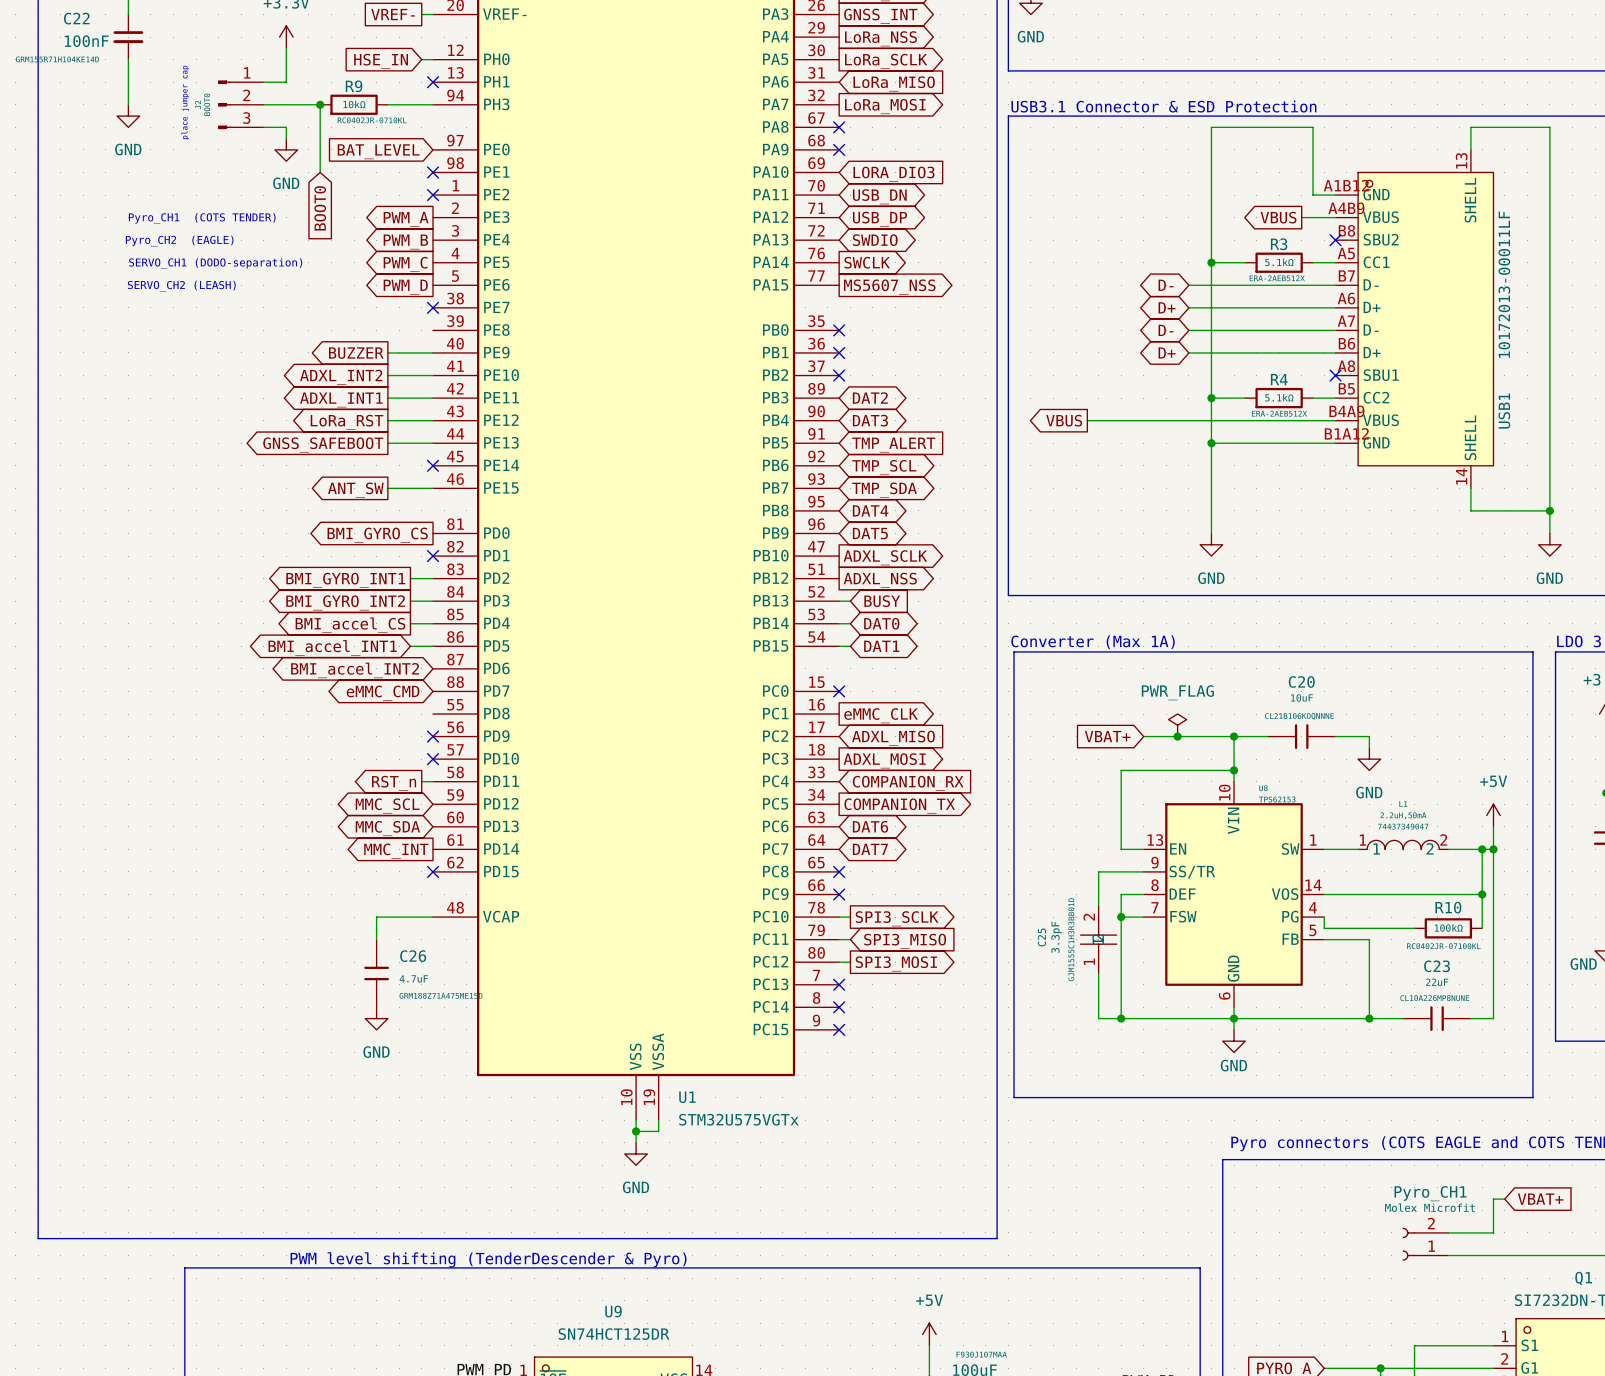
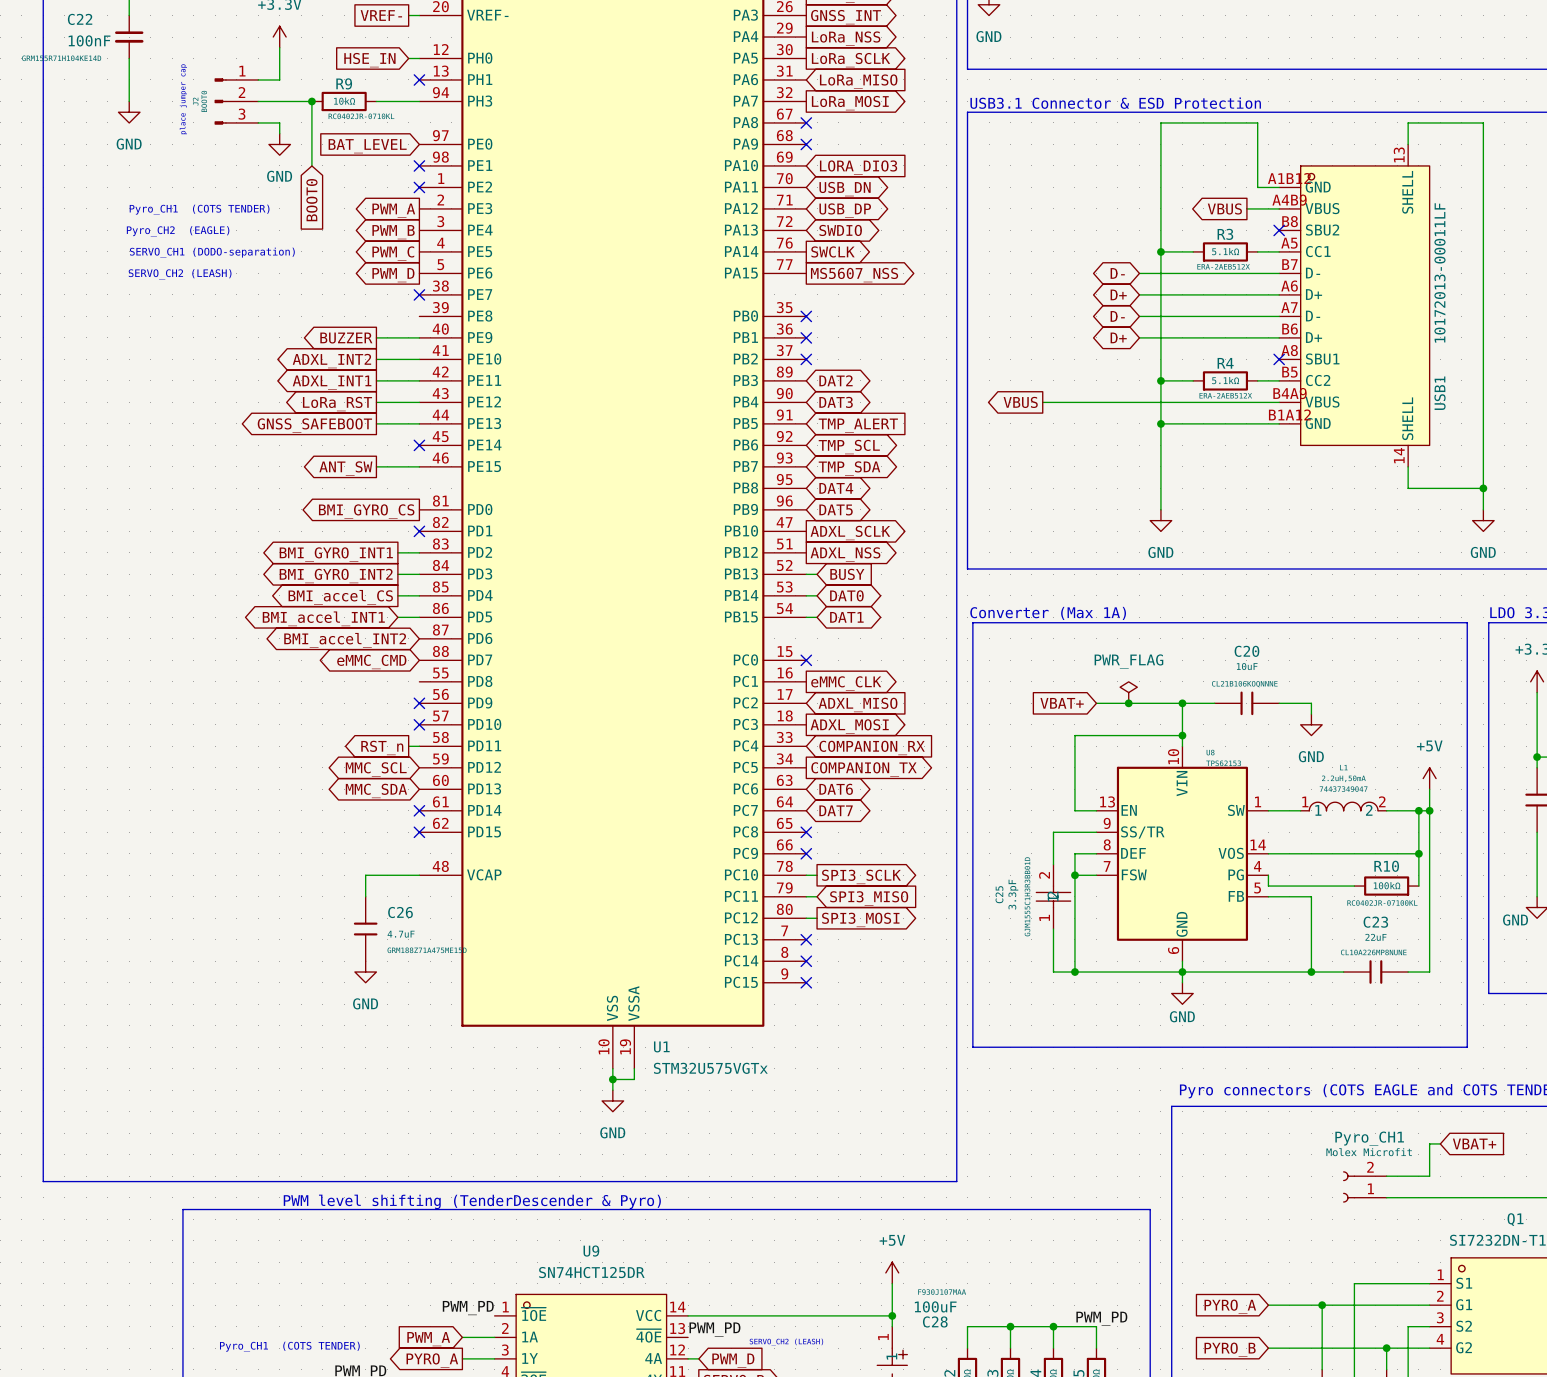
no-connect mark: none -> (419, 810)
global label: MMC_INT (396, 851) -> none

